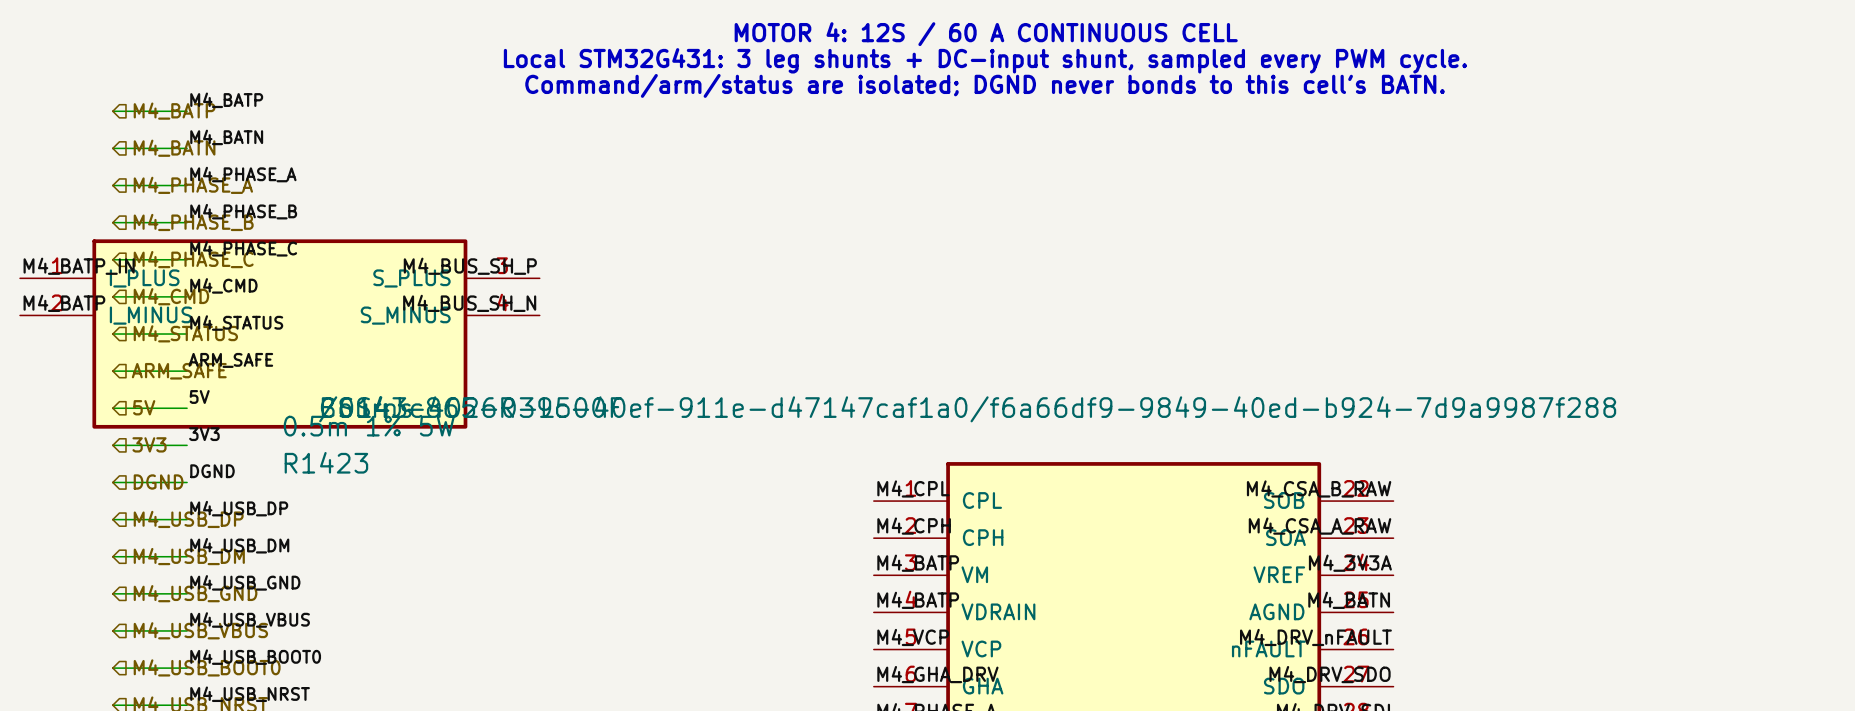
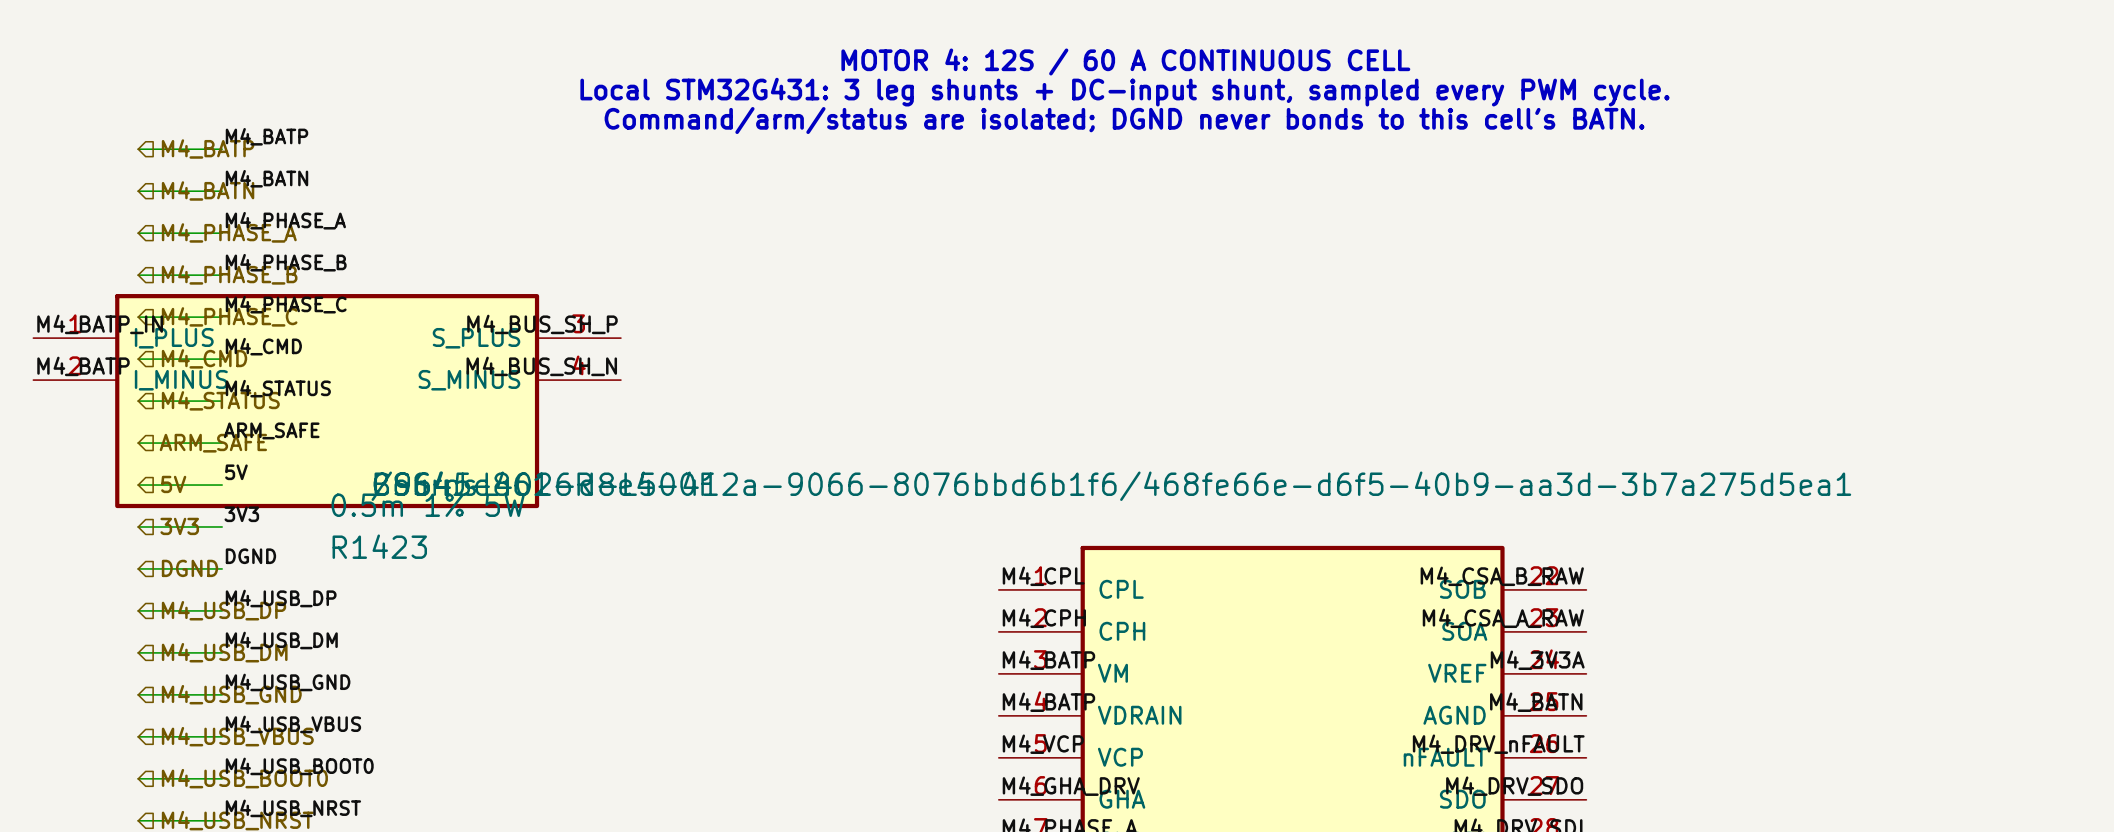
R1423 text: /0143c865-039c-40ef-911e-d47147caf1a0/f6a66df9-9849-40ed-b924-7d9a9987f288 (967, 409) -> /9645d861-d8e4-412a-9066-8076bbd6b1f6/468fe66e-d6f5-40b9-aa3d-3b7a275d5ea1 (1111, 486)

